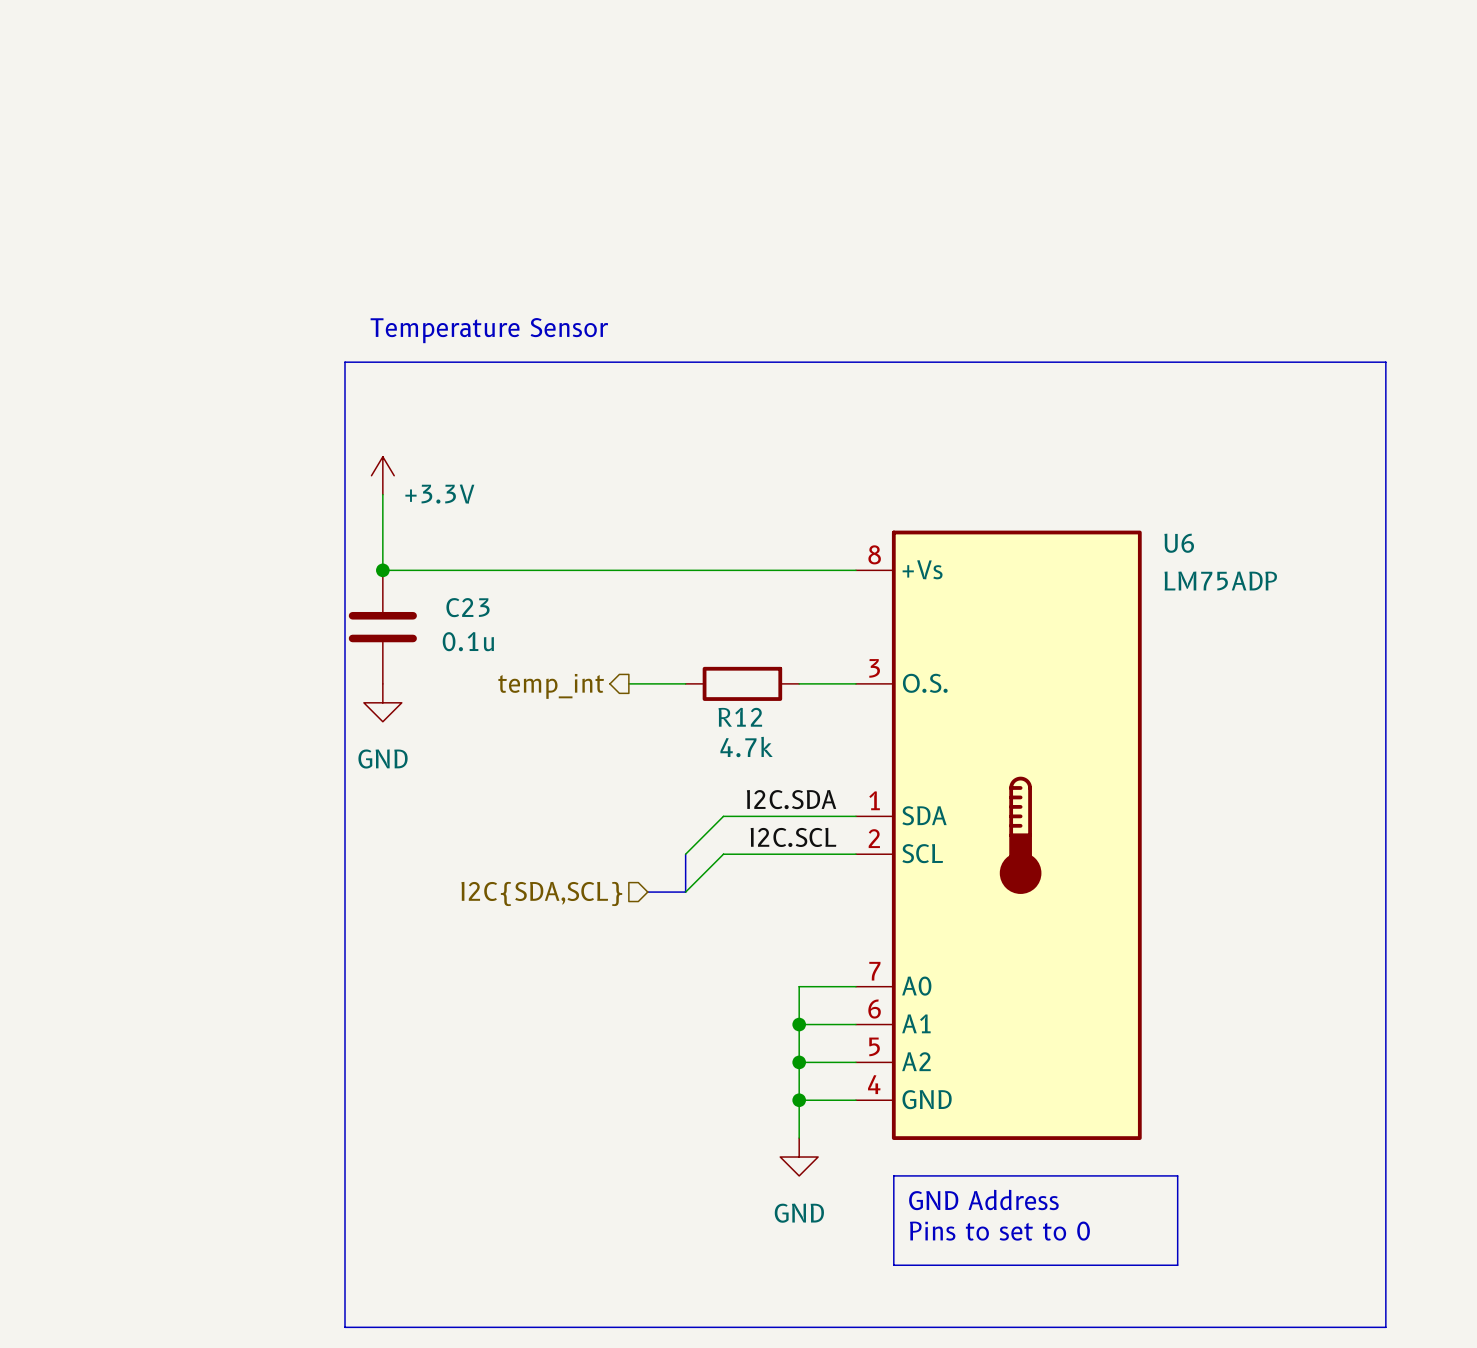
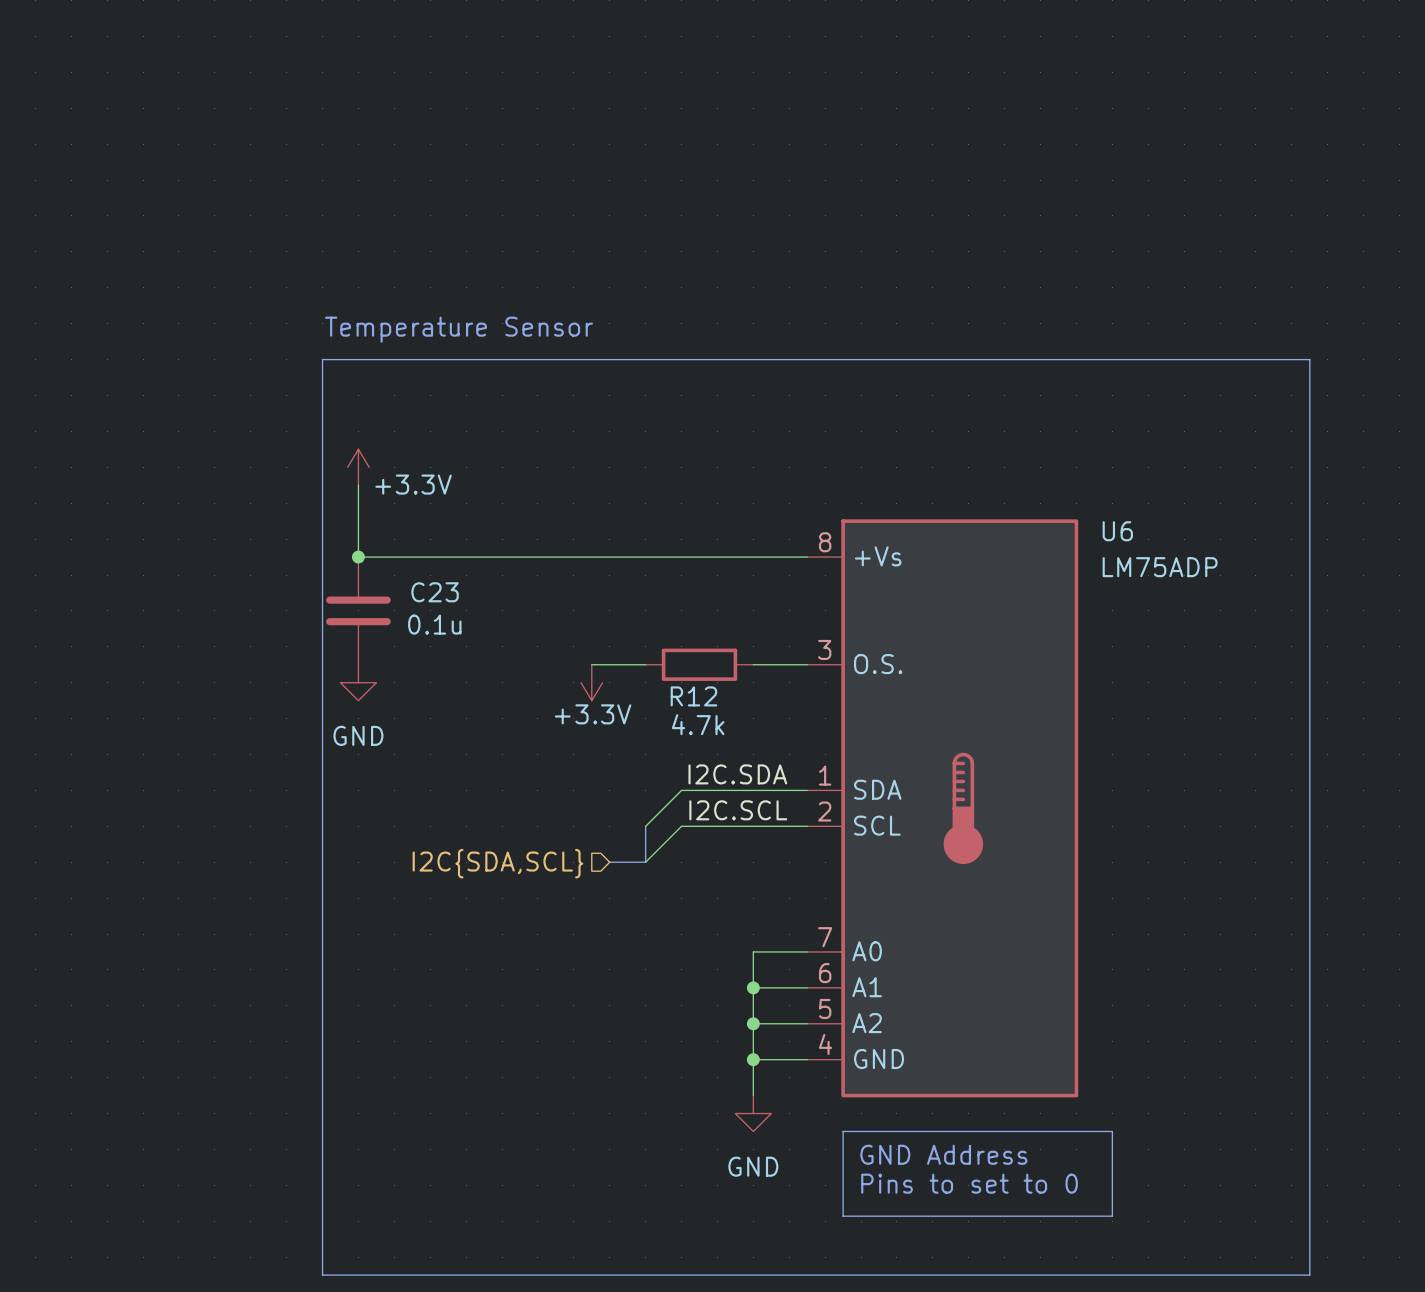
hierarchical label: temp_int (551, 686) -> none
power symbol: none -> +3.3V (591, 682)

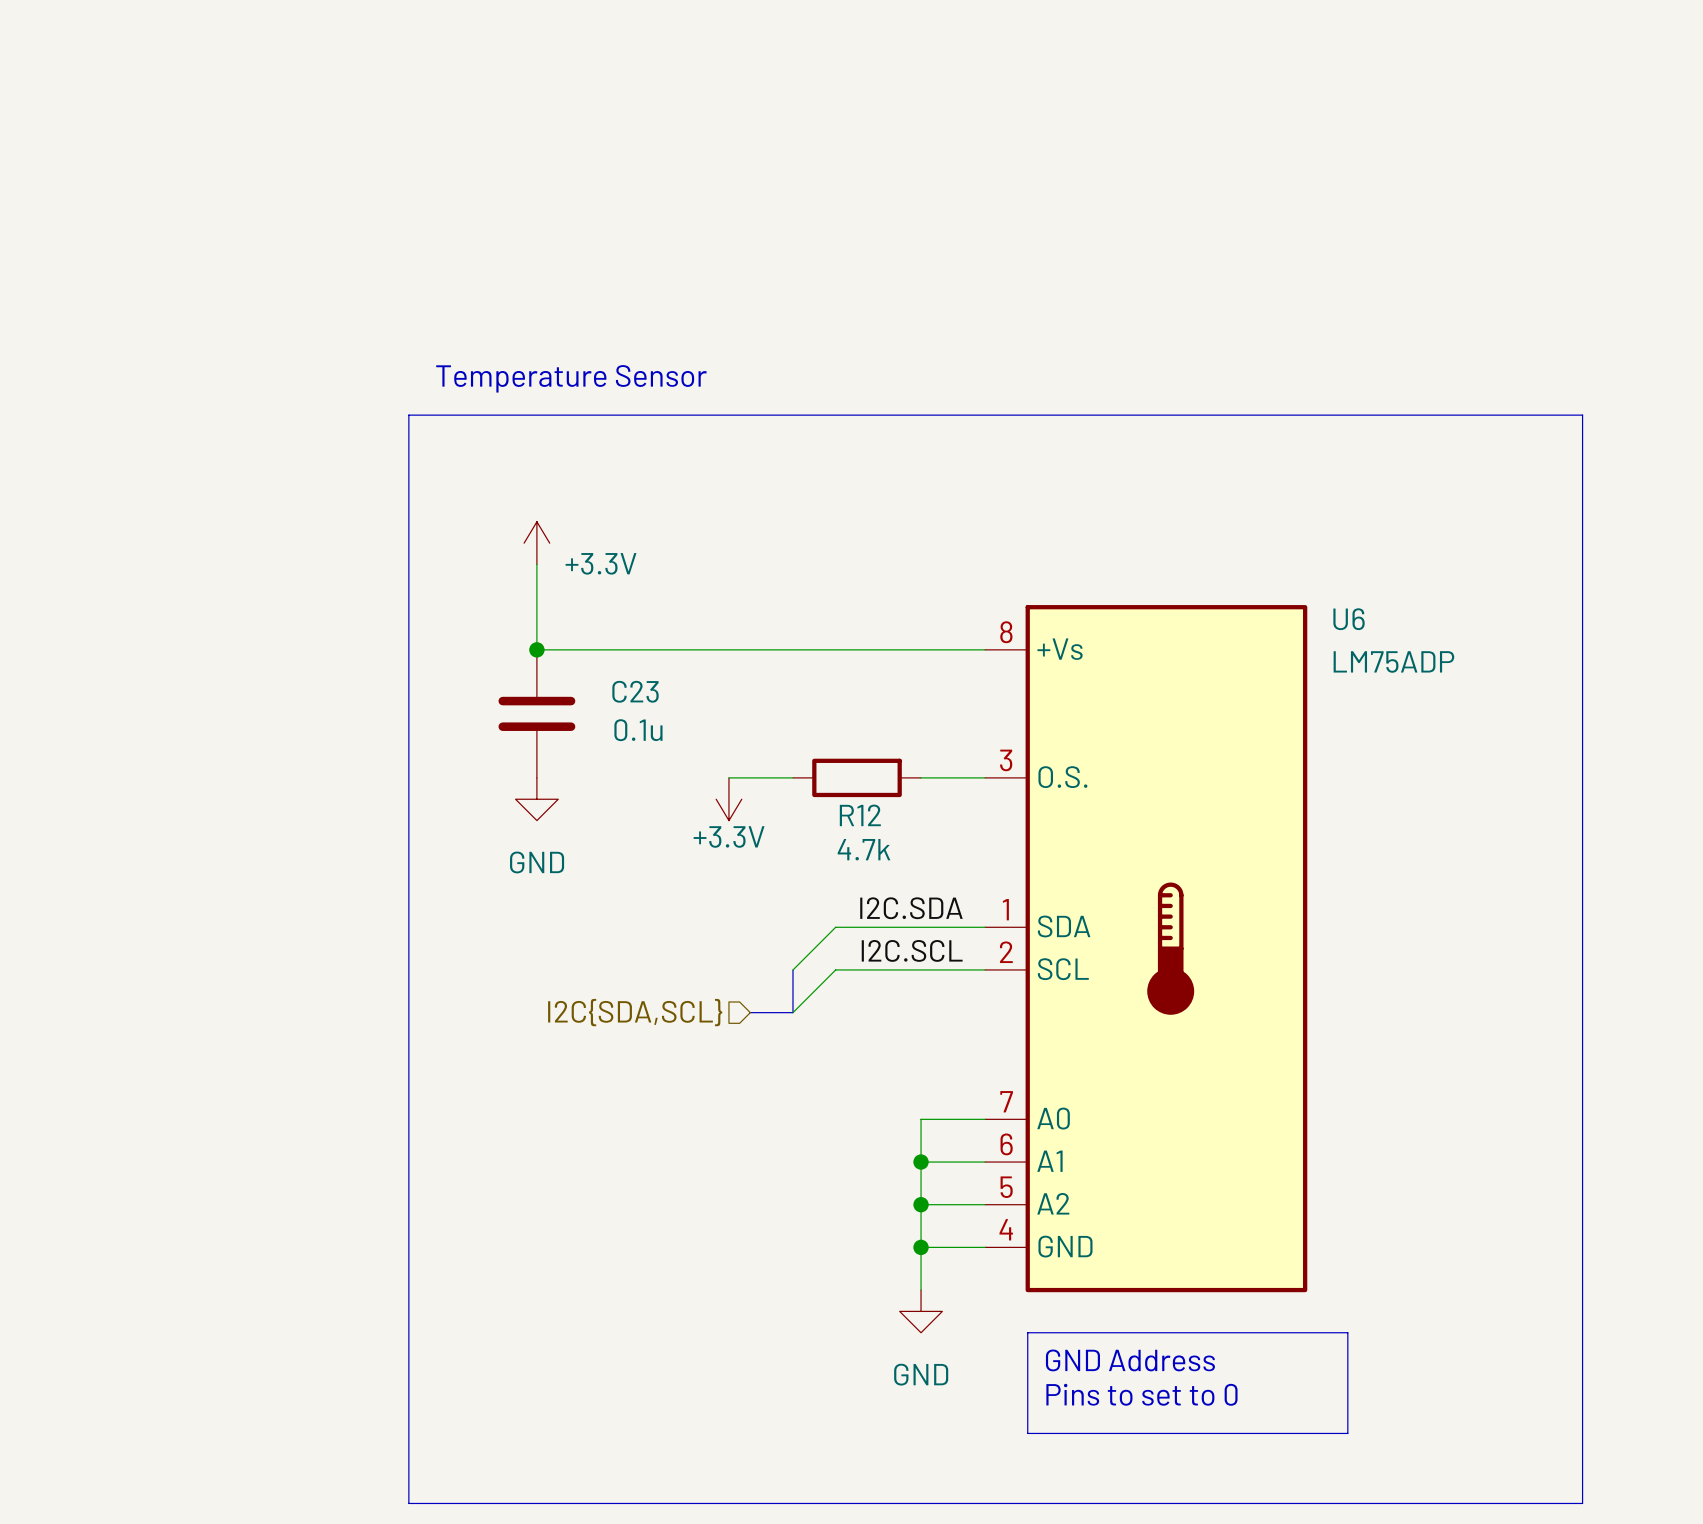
power symbol position: +3.3V (358, 467) -> +3.3V (536, 543)
wire: (358, 485) (358, 557) (430, 557) -> (536, 564) (536, 649)
junction position: (358, 557) -> (536, 649)
C23 position: (358, 610) -> (536, 713)
power symbol position: GND (358, 682) -> GND (536, 799)

